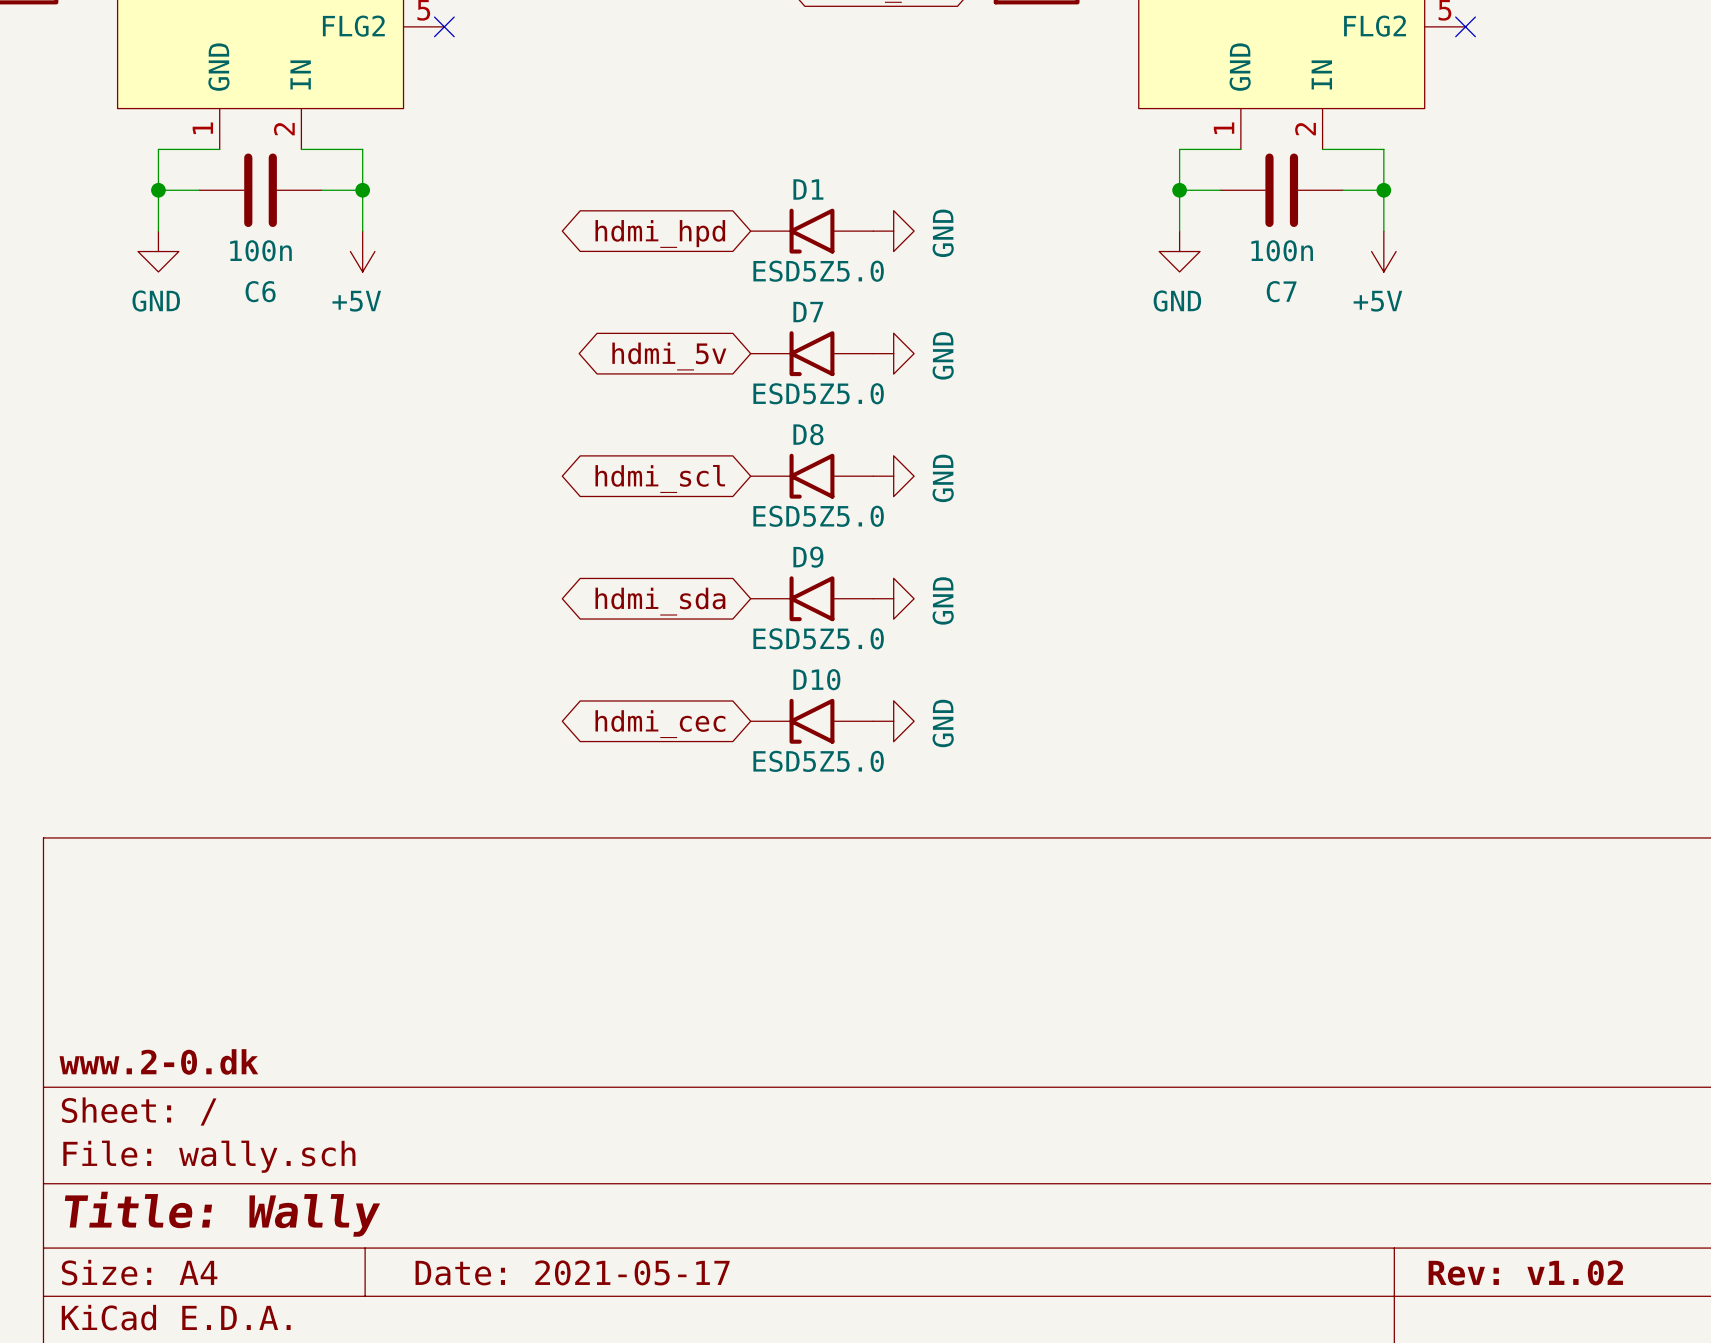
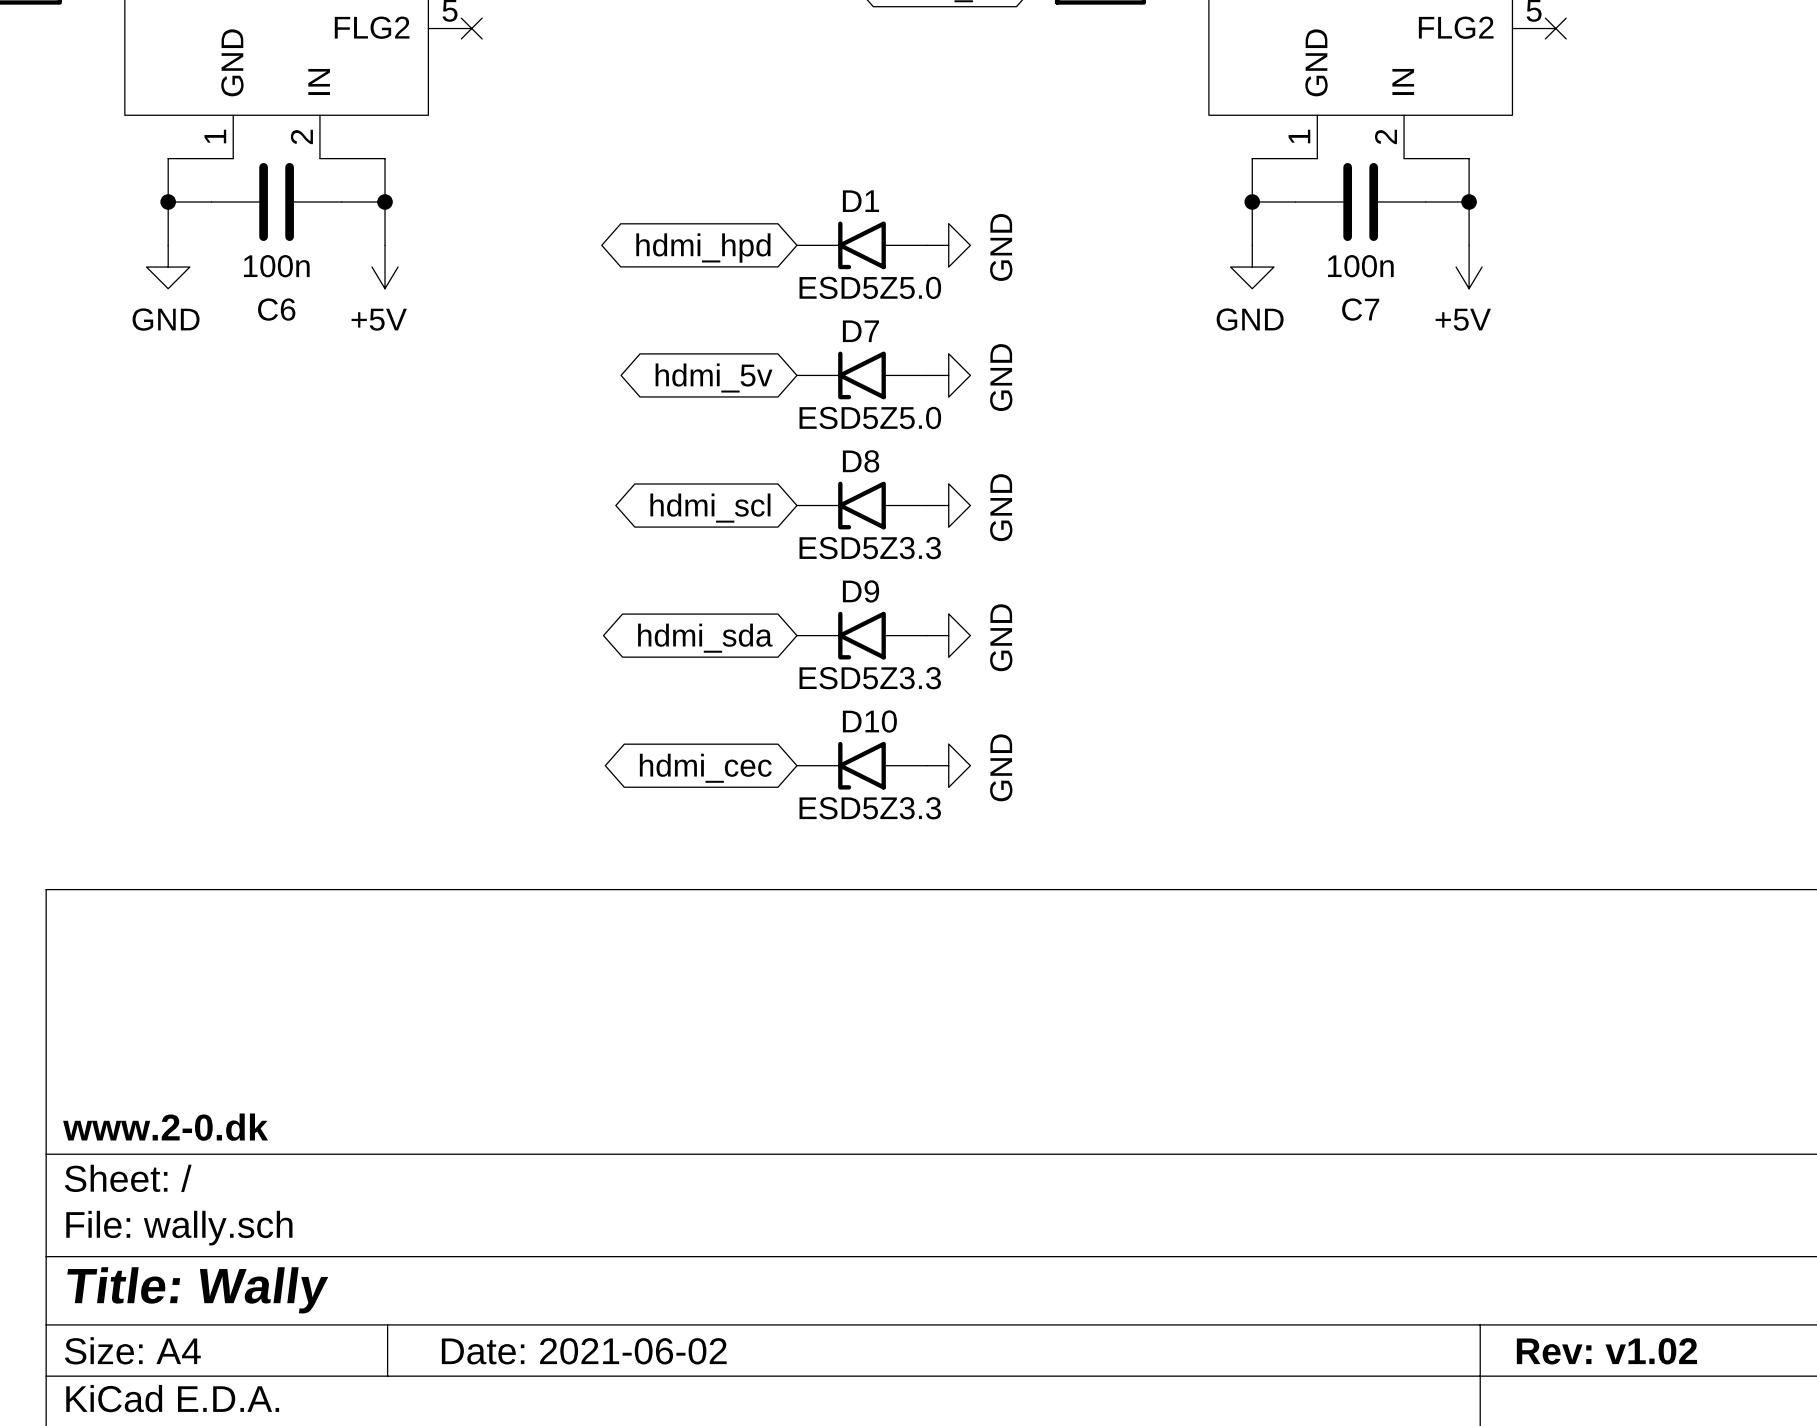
D8 value: ESD5Z5.0 (818, 516) -> ESD5Z3.3 (870, 548)
D9 value: ESD5Z5.0 (818, 638) -> ESD5Z3.3 (870, 678)
D10 value: ESD5Z5.0 (818, 761) -> ESD5Z3.3 (870, 808)
title block: Date: 2021-05-17 (572, 1272) -> Date: 2021-06-02 (584, 1351)

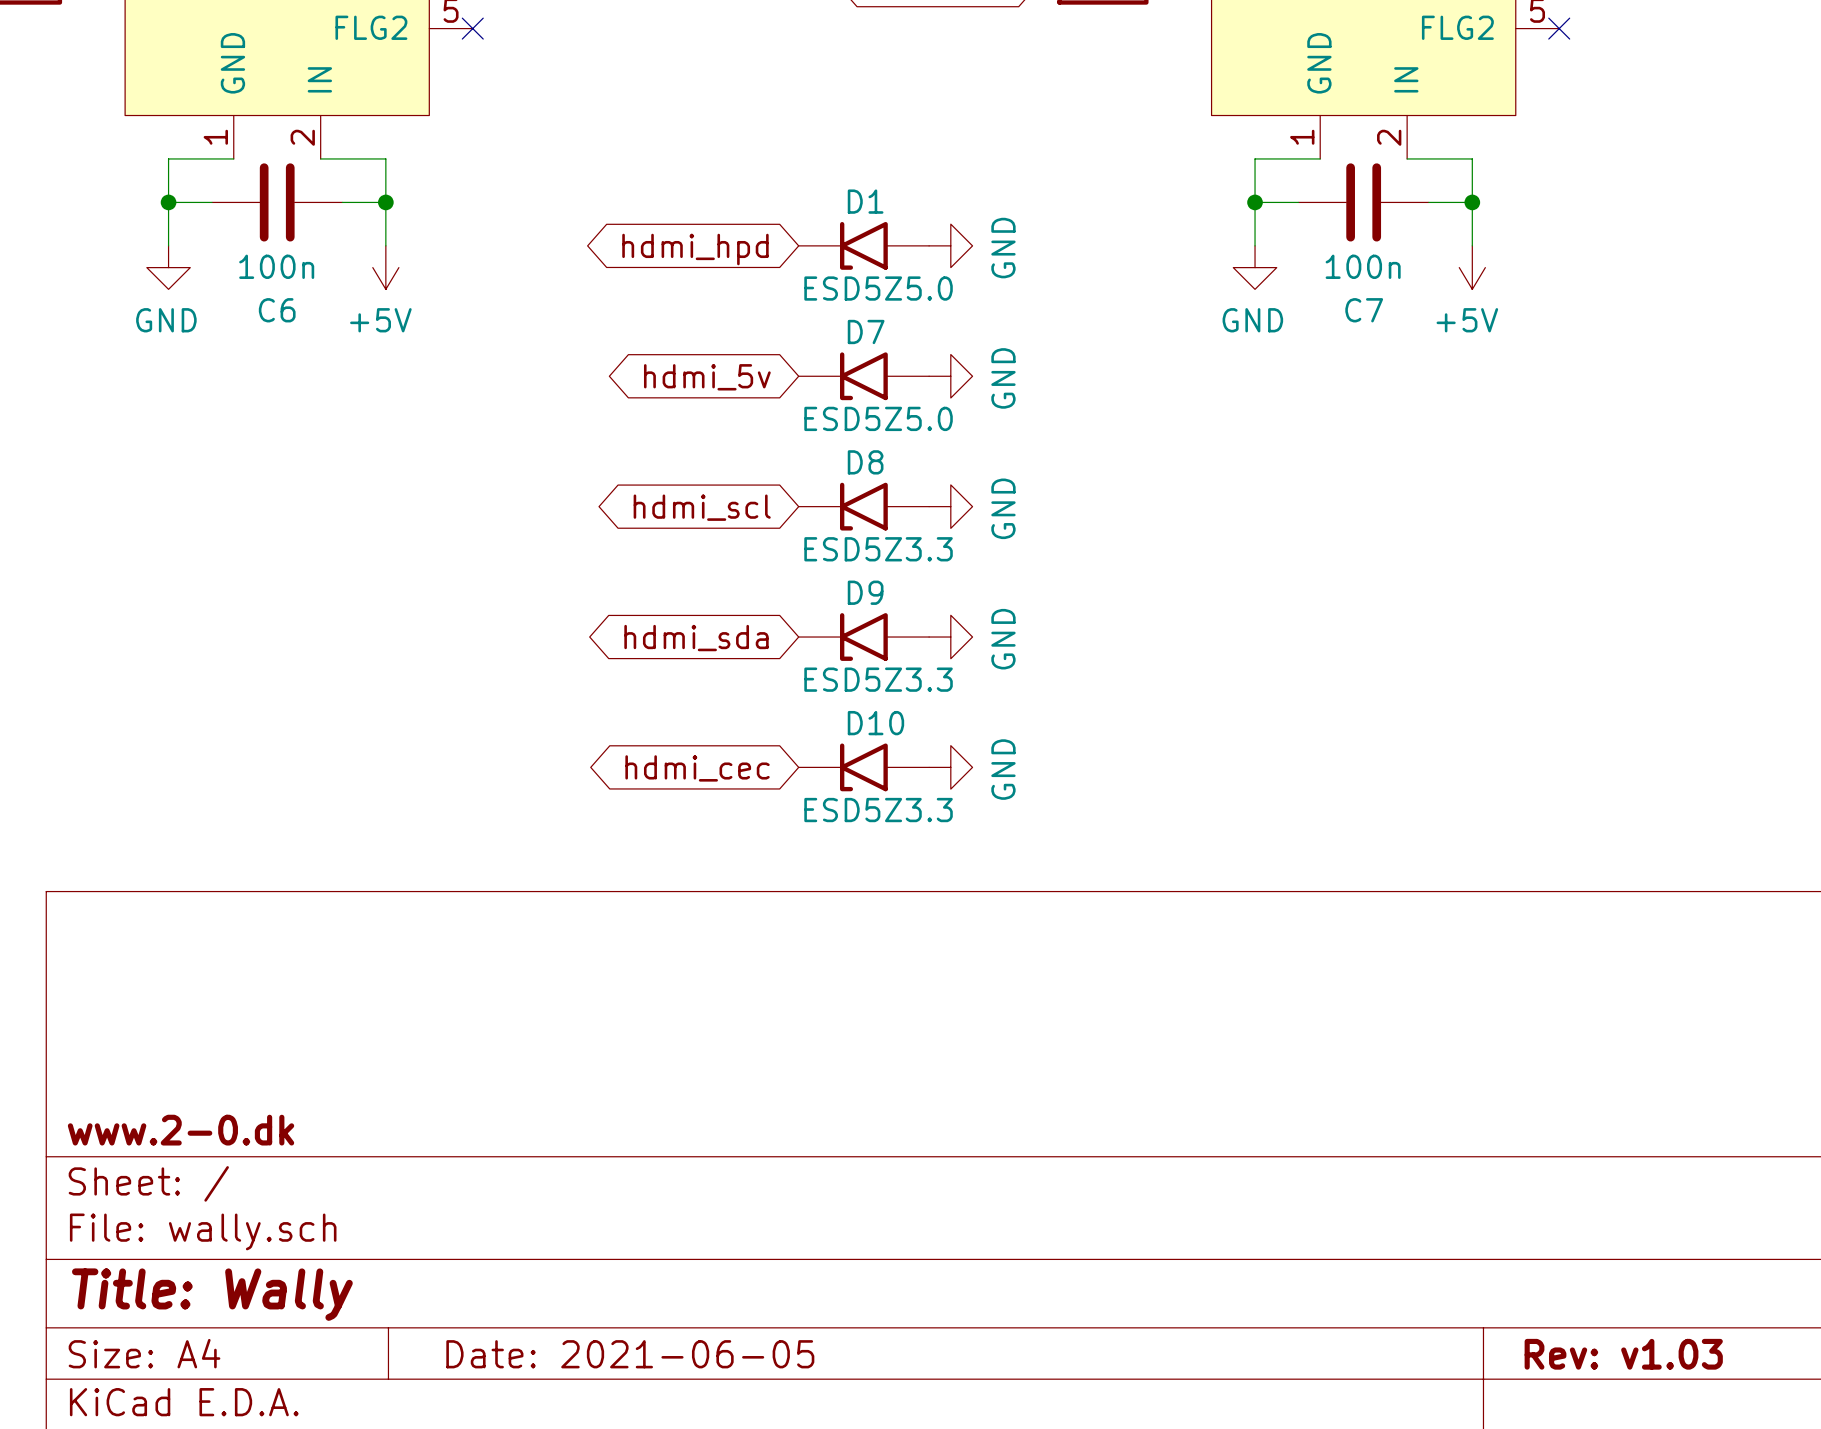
title block: Date: 2021-06-02 (584, 1351) -> Date: 2021-06-05 (630, 1354)
title block: Rev: v1.02 (1606, 1351) -> Rev: v1.03 (1623, 1354)

